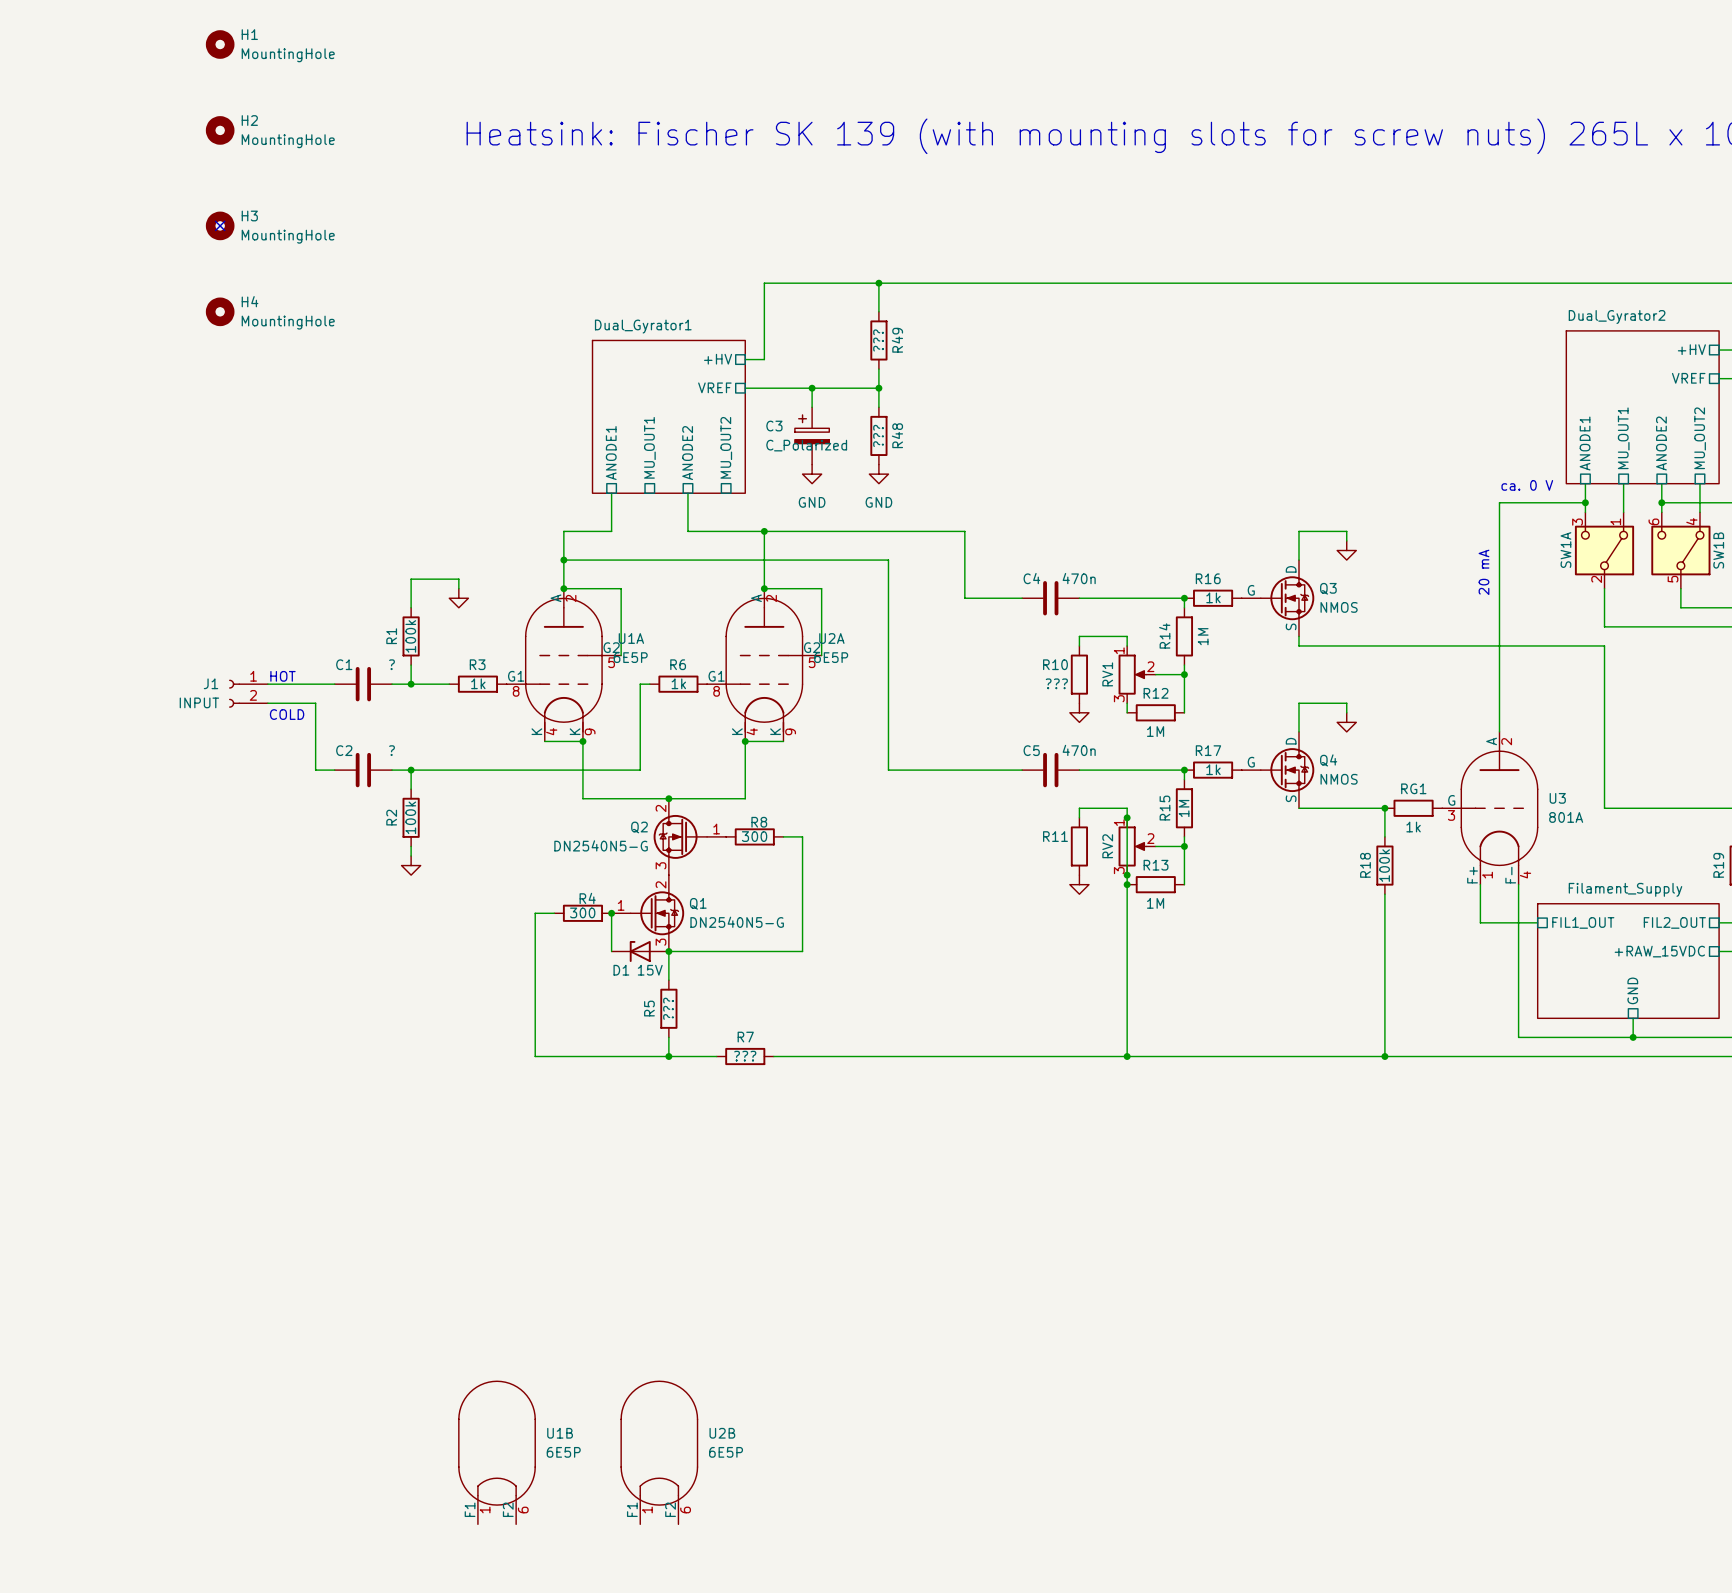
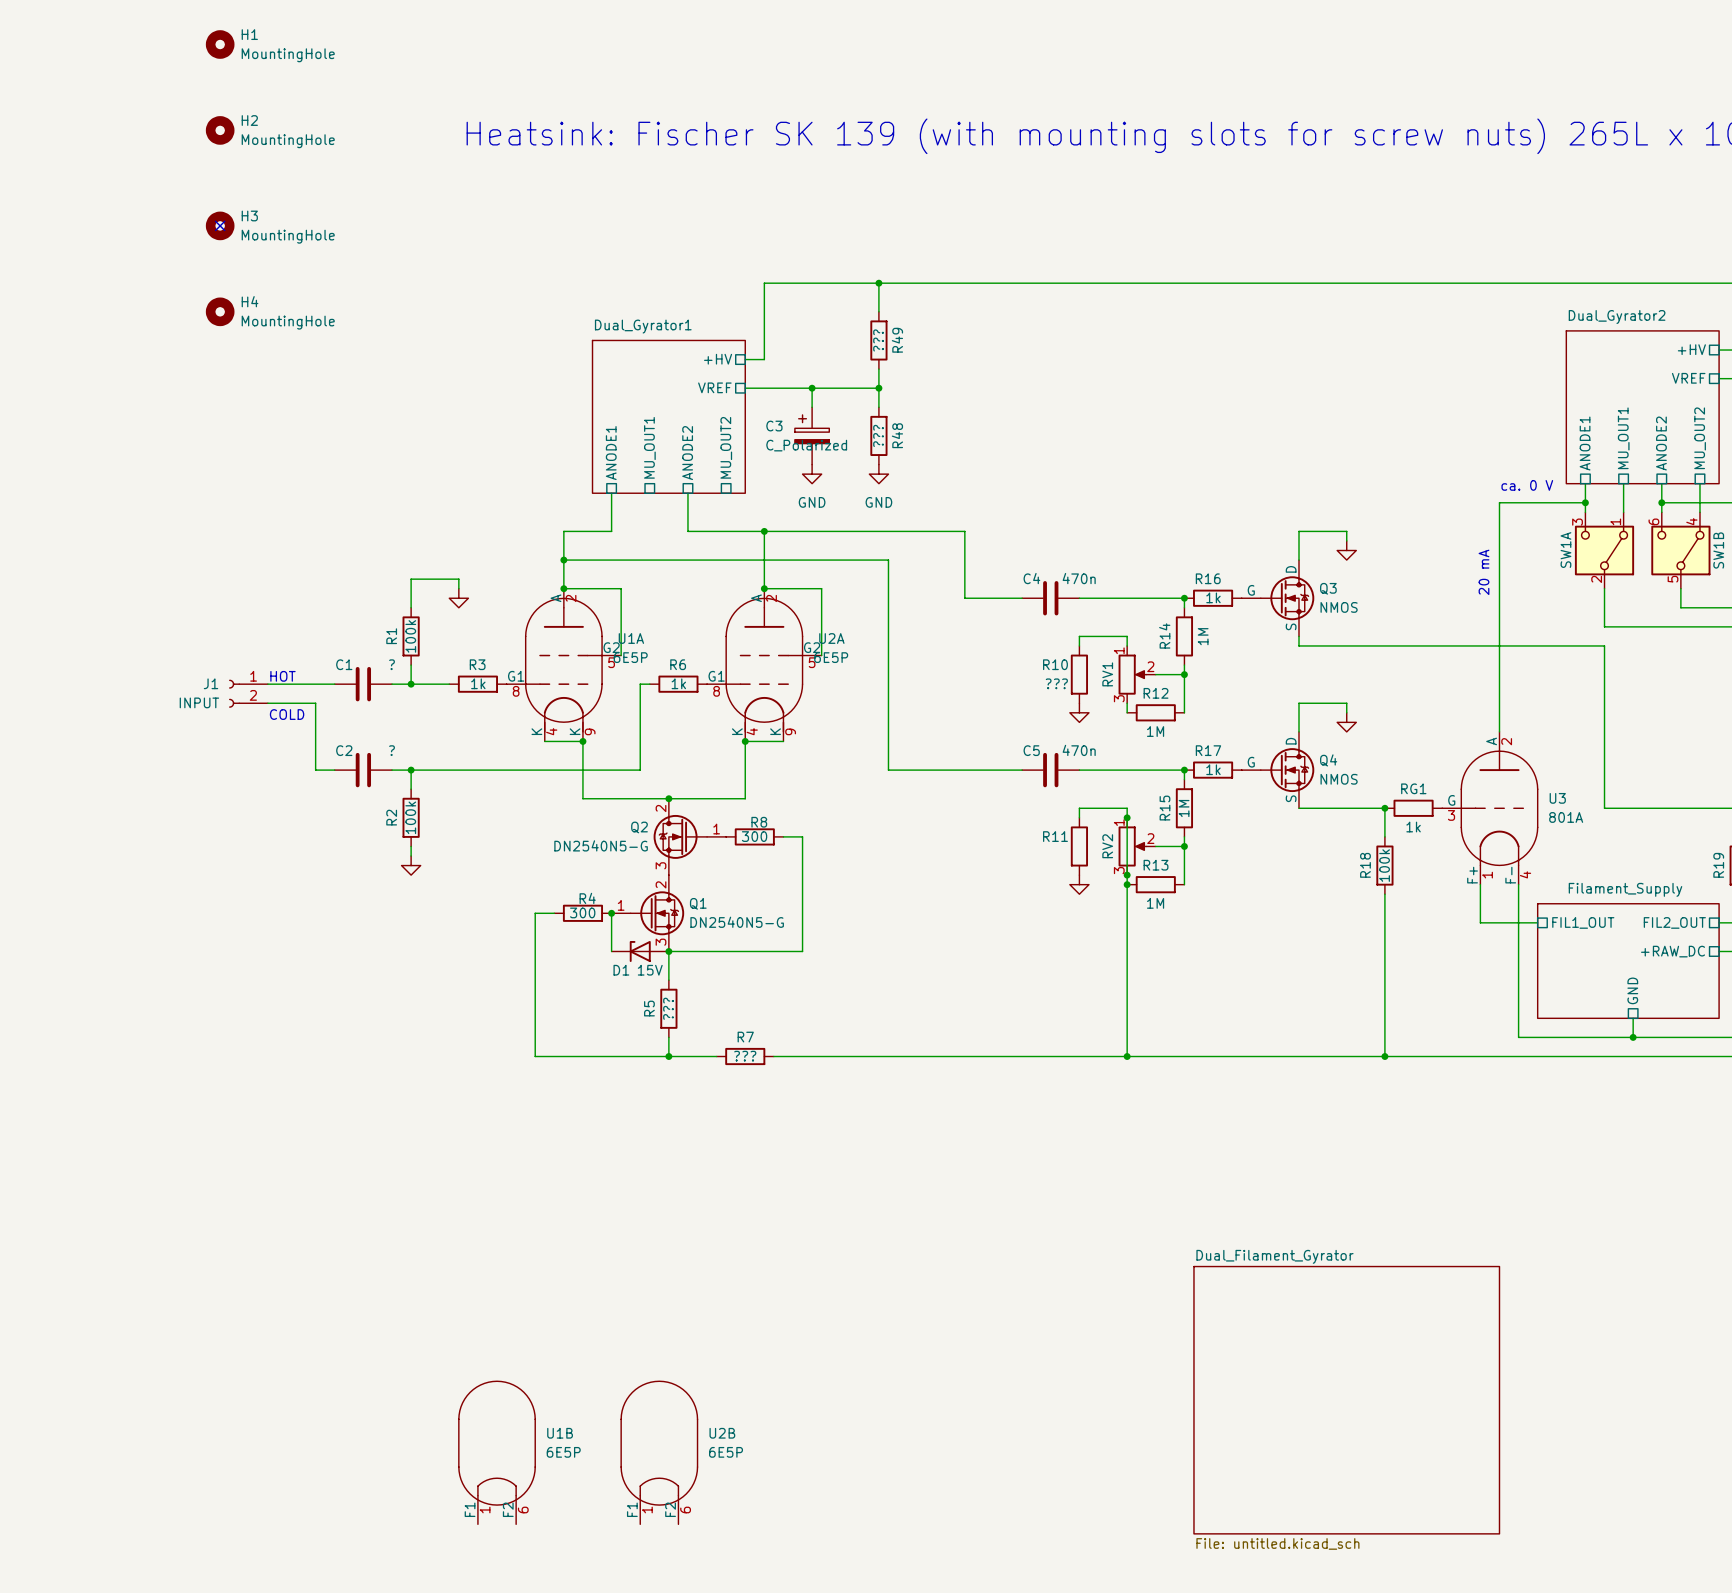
sheet pin: +RAW_15VDC (1659, 951) -> +RAW_DC (1673, 951)
sheet Dual_Filament_Gyrator: none -> File: untitled.kicad_sch (1346, 1400)

